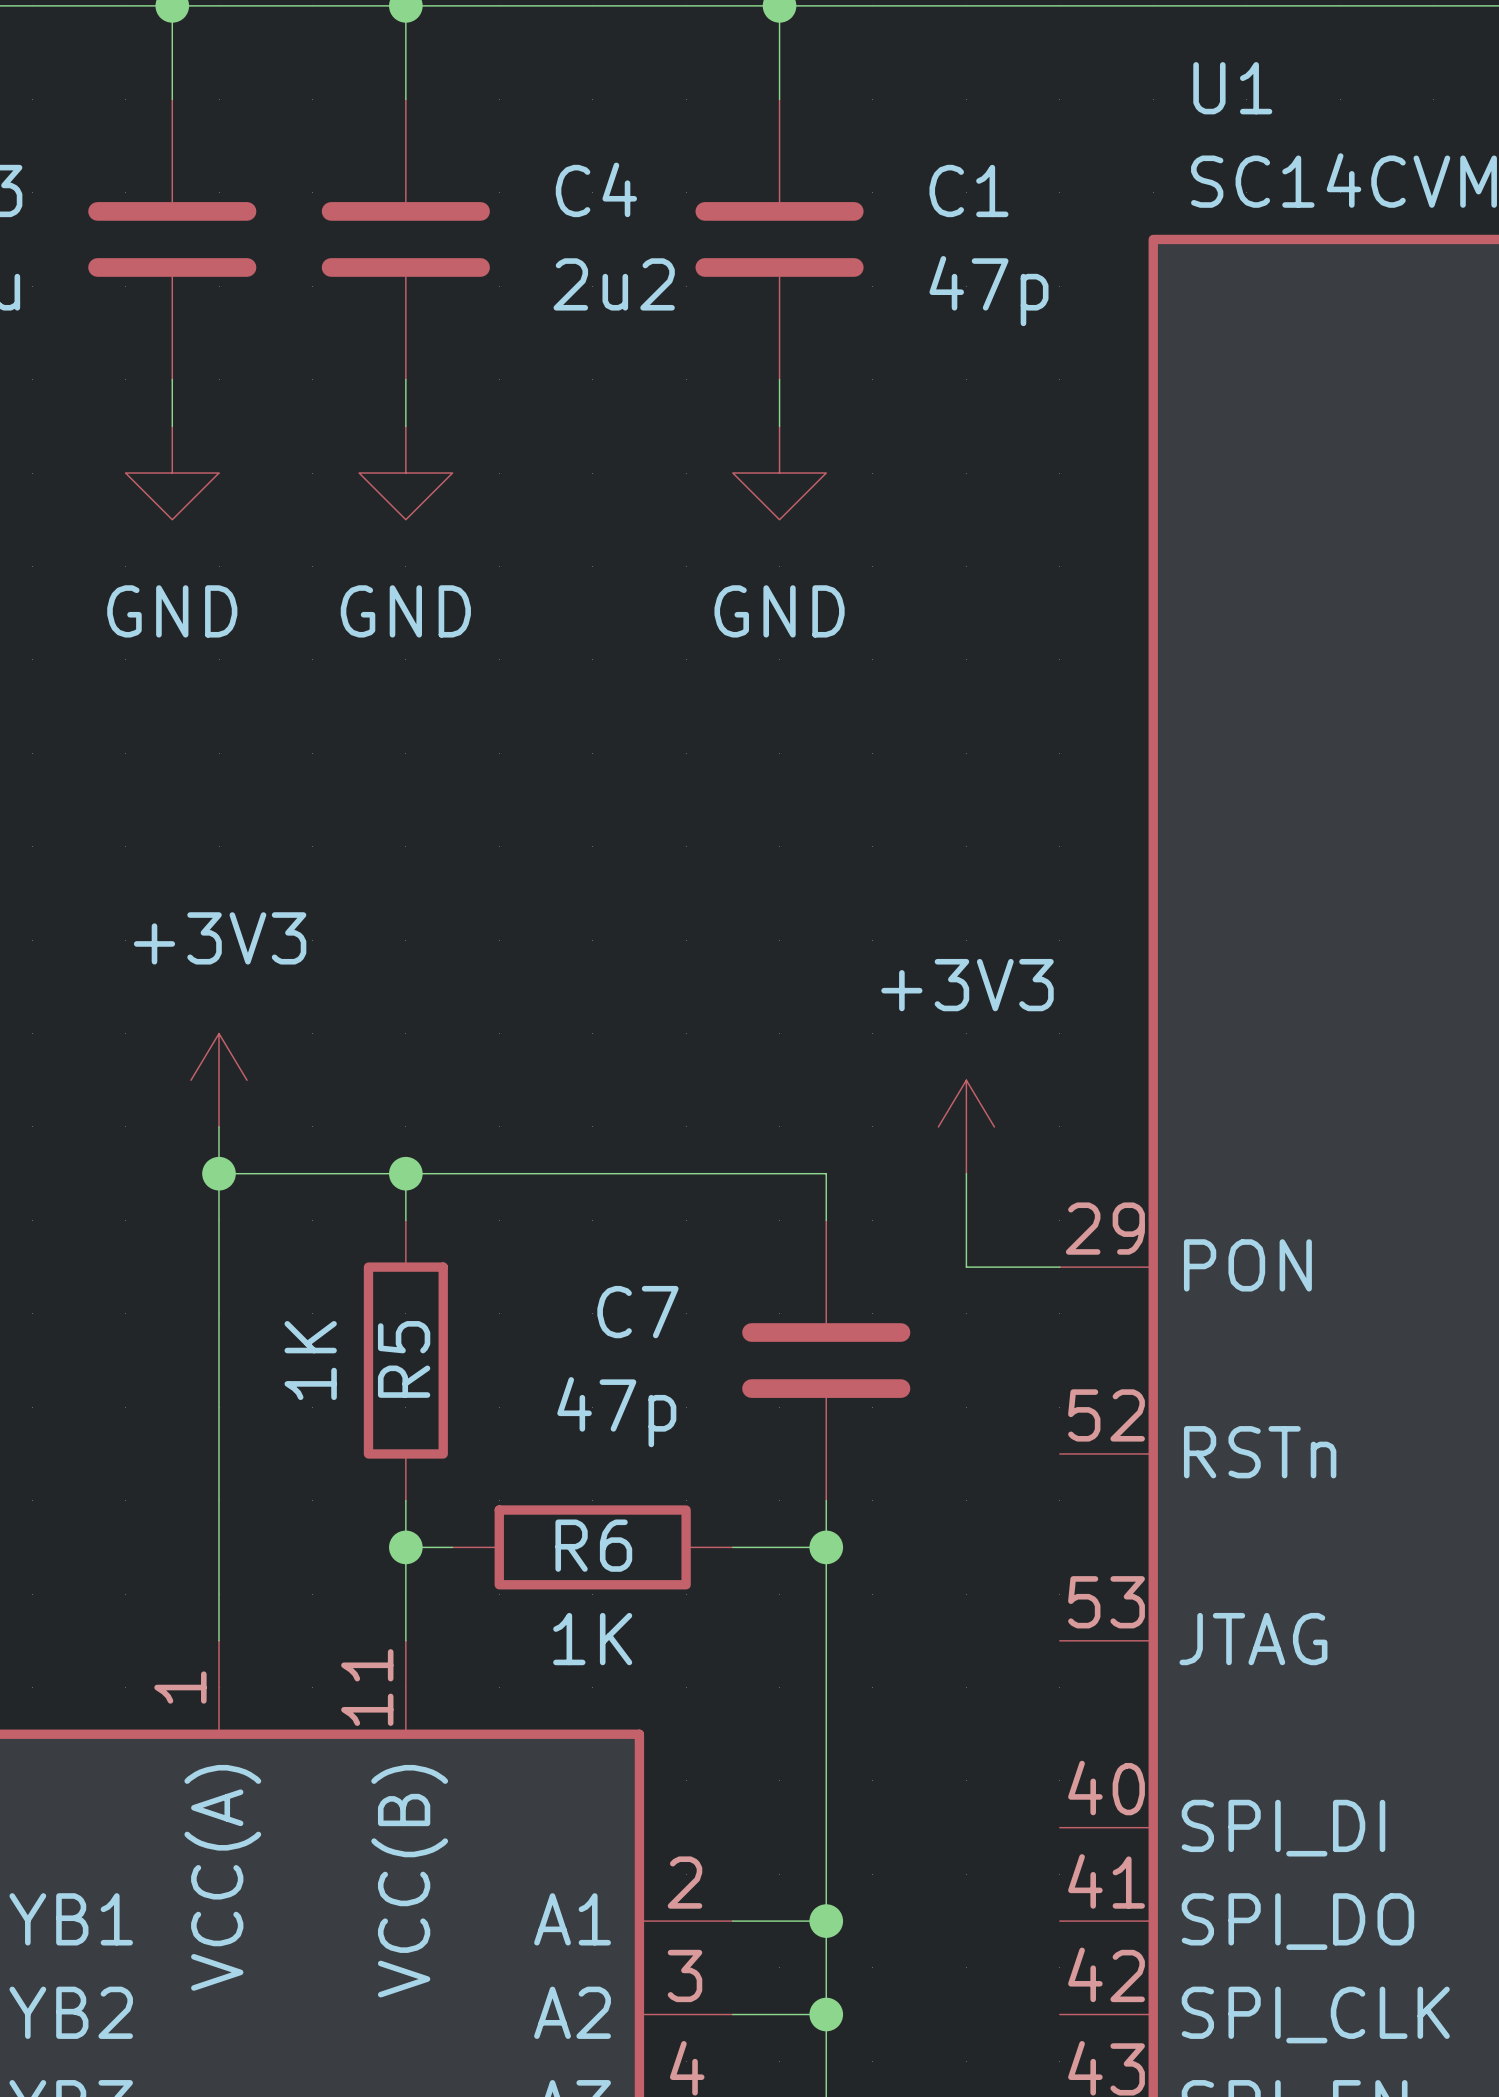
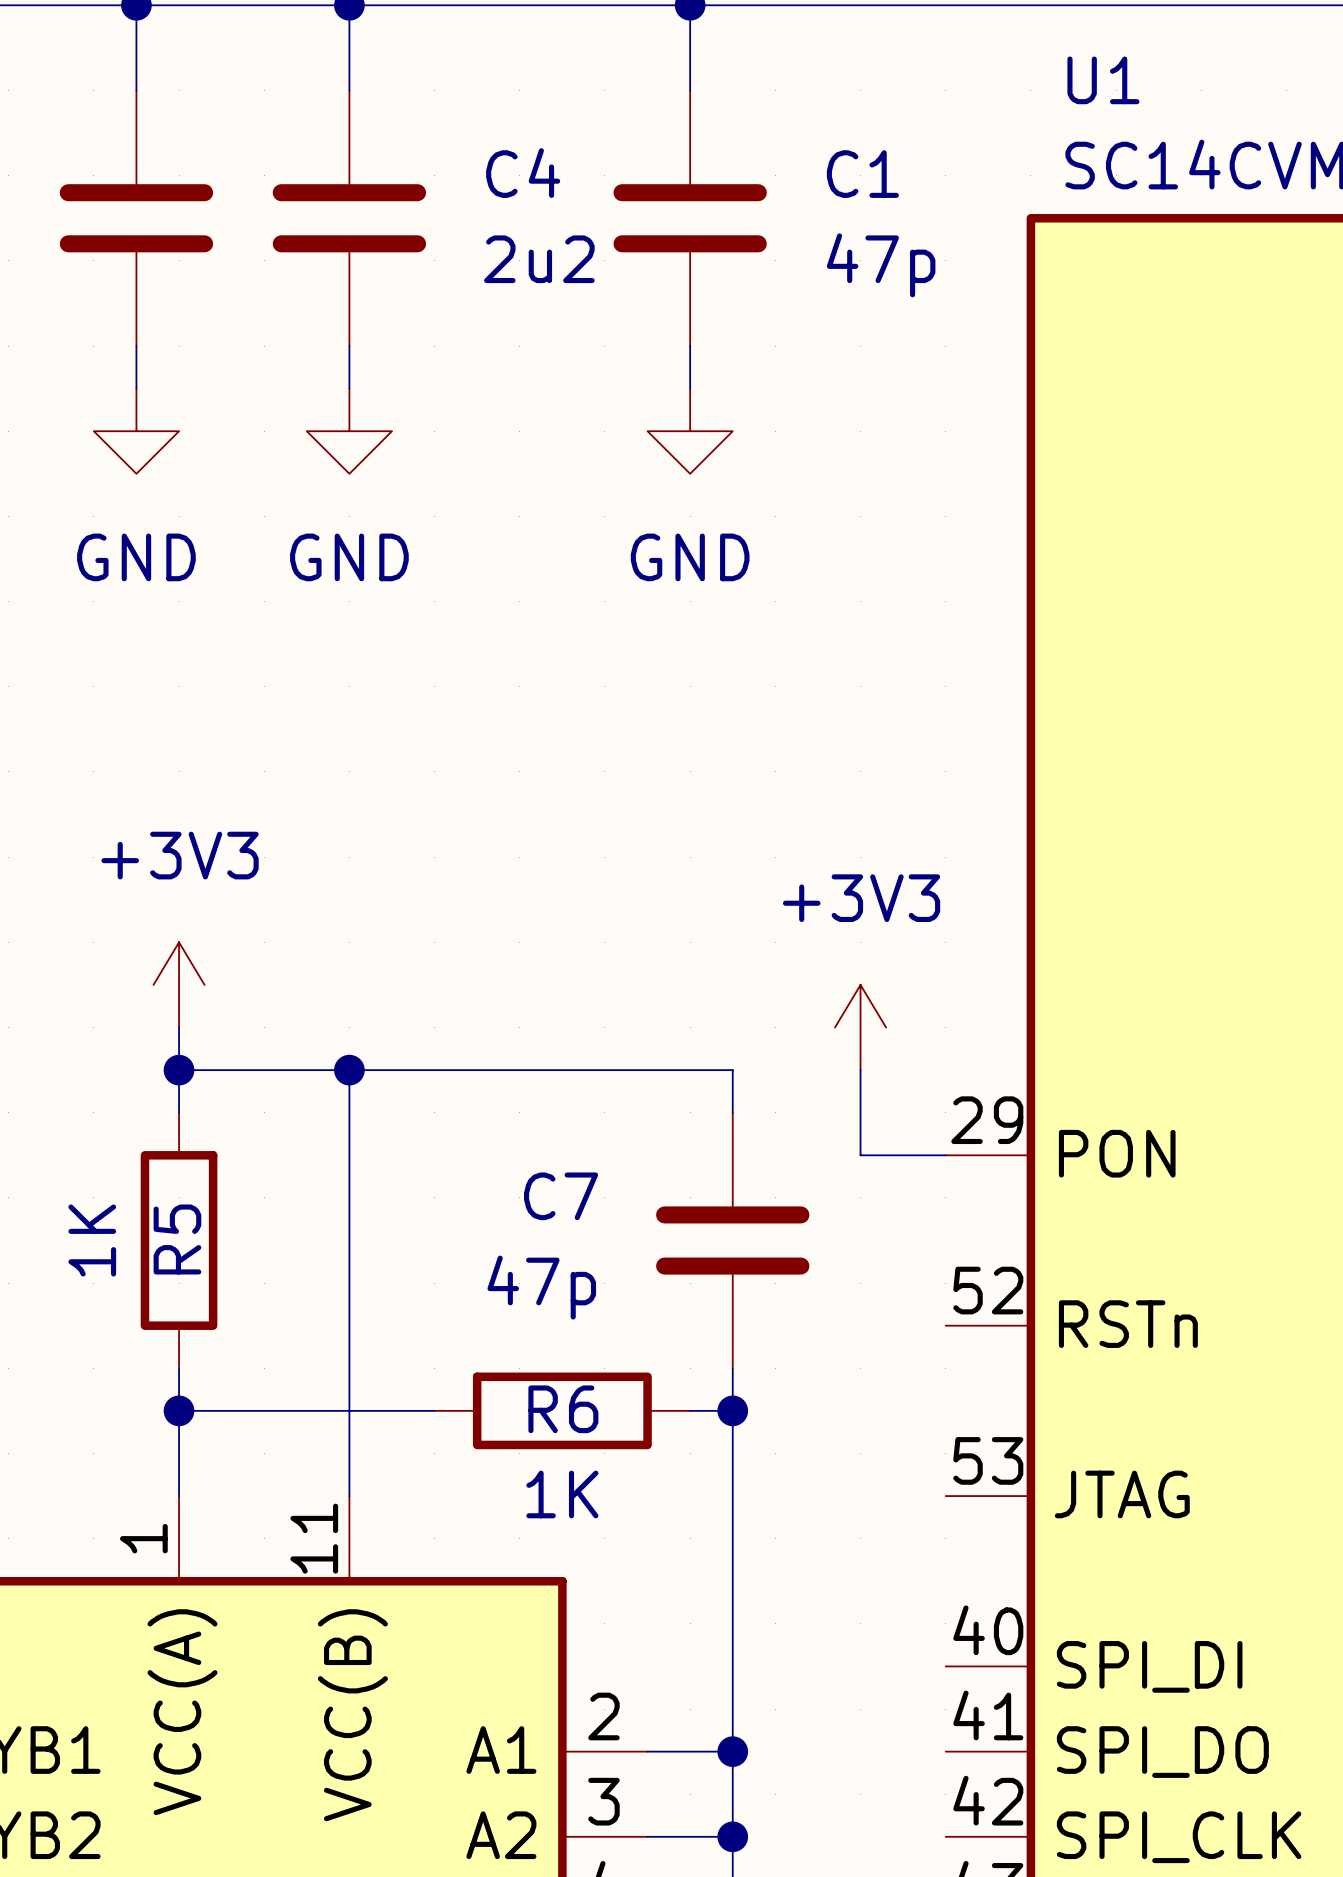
wire: (219, 1220) (219, 1500) -> (349, 1112) (349, 1368)
R5 position: (405, 1360) -> (179, 1240)
wire: none -> (179, 1410) (349, 1410)
junction position: (405, 1547) -> (179, 1410)
R6 position: (592, 1547) -> (562, 1410)

